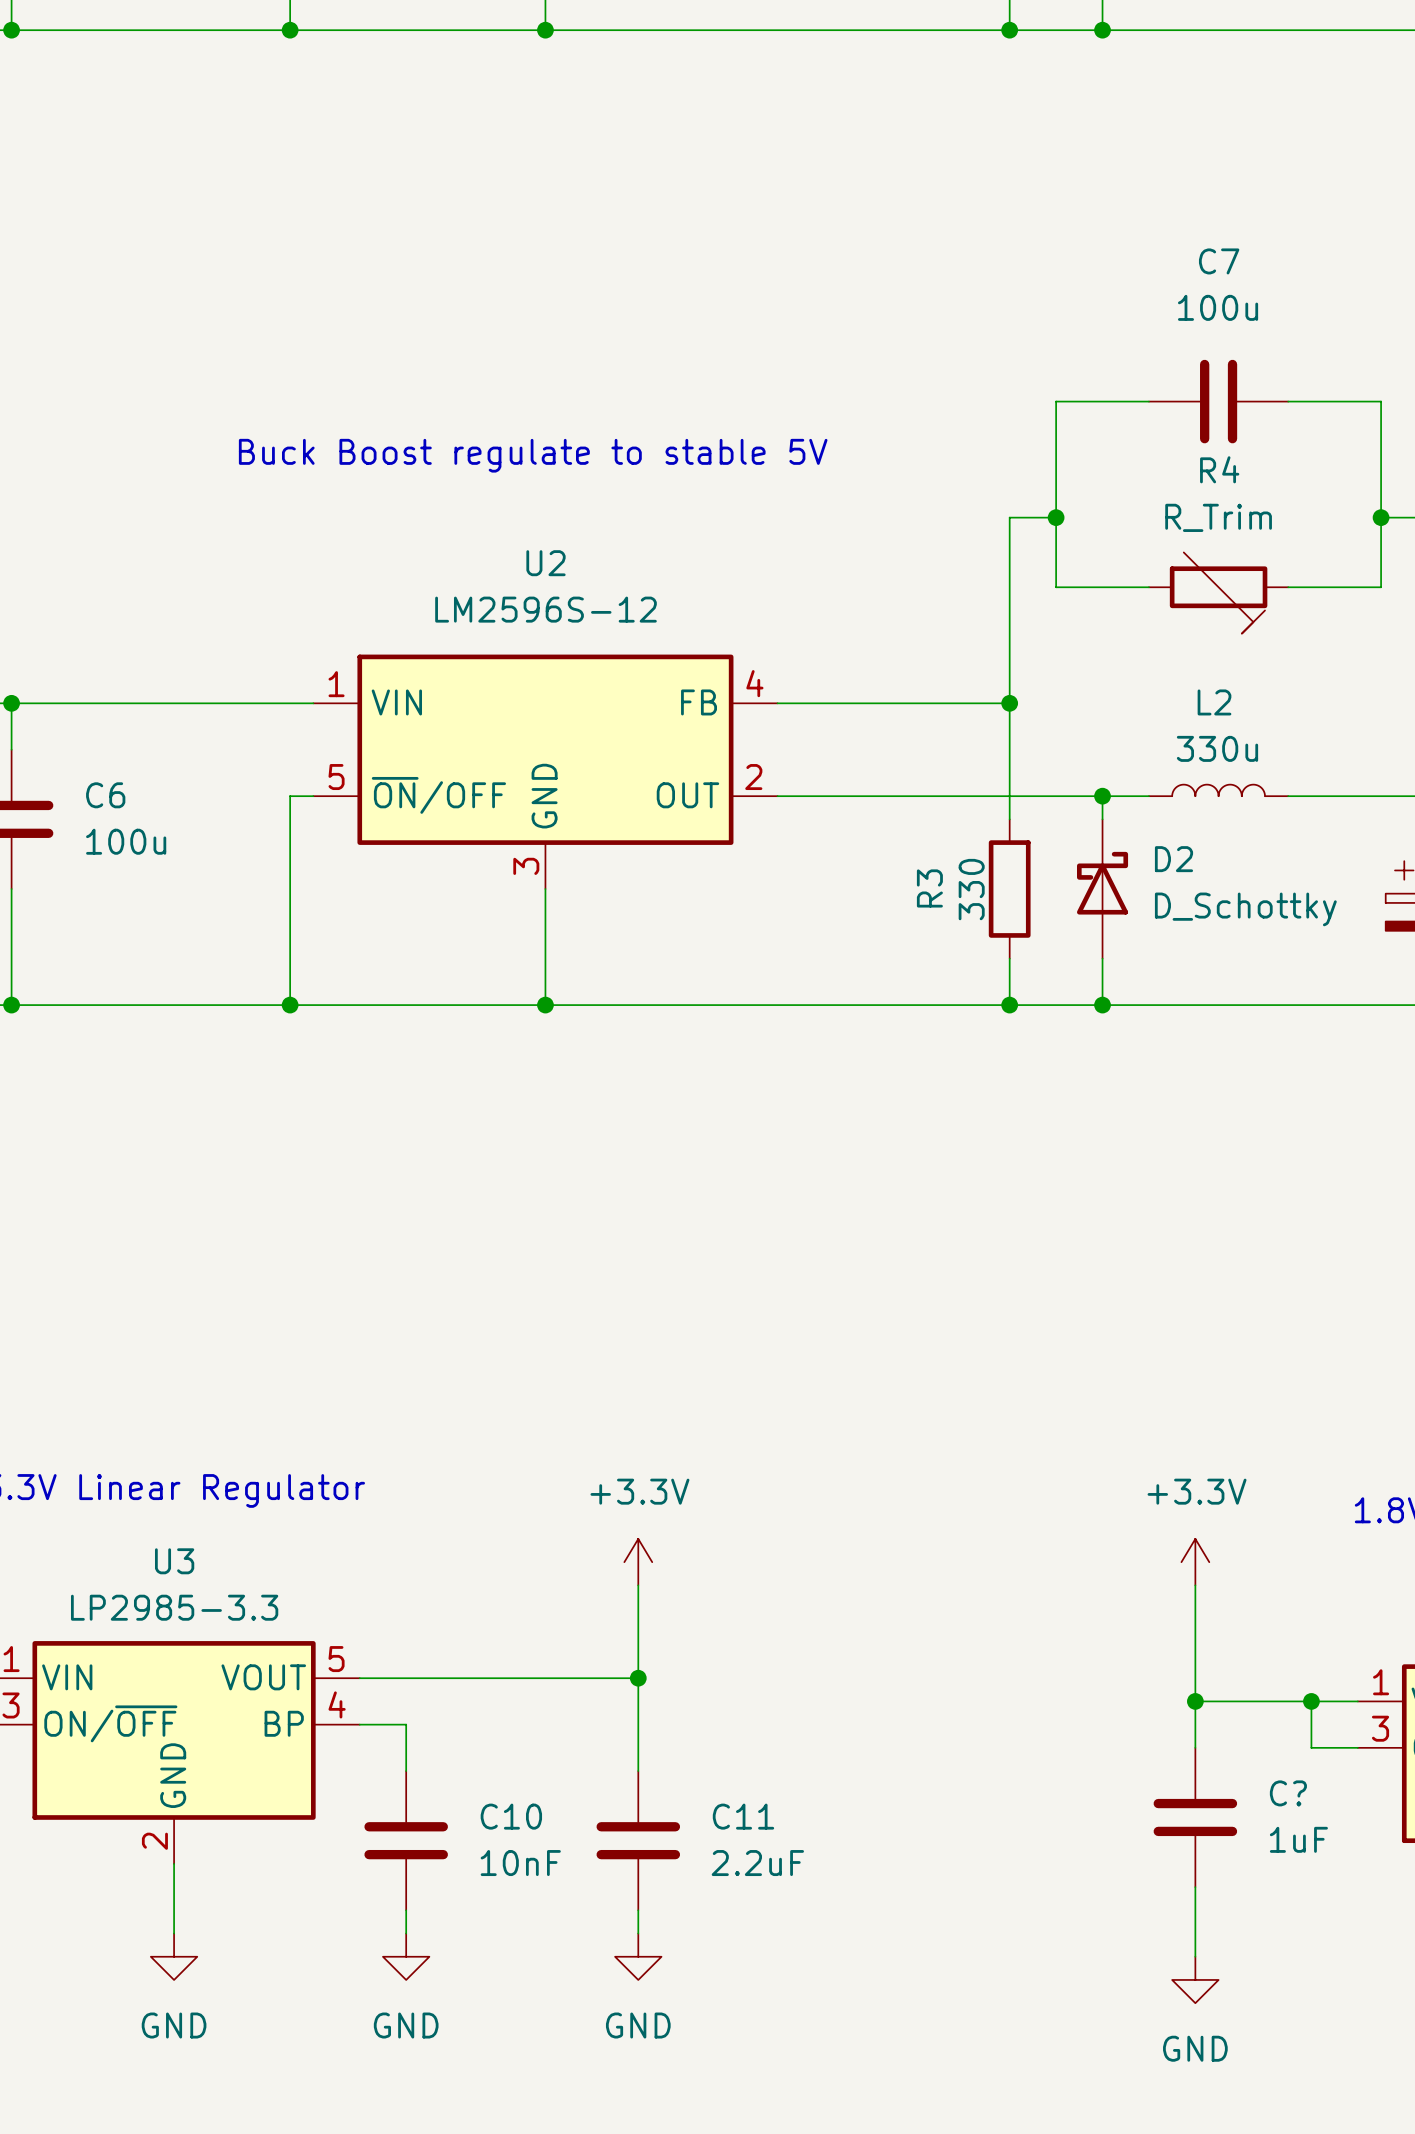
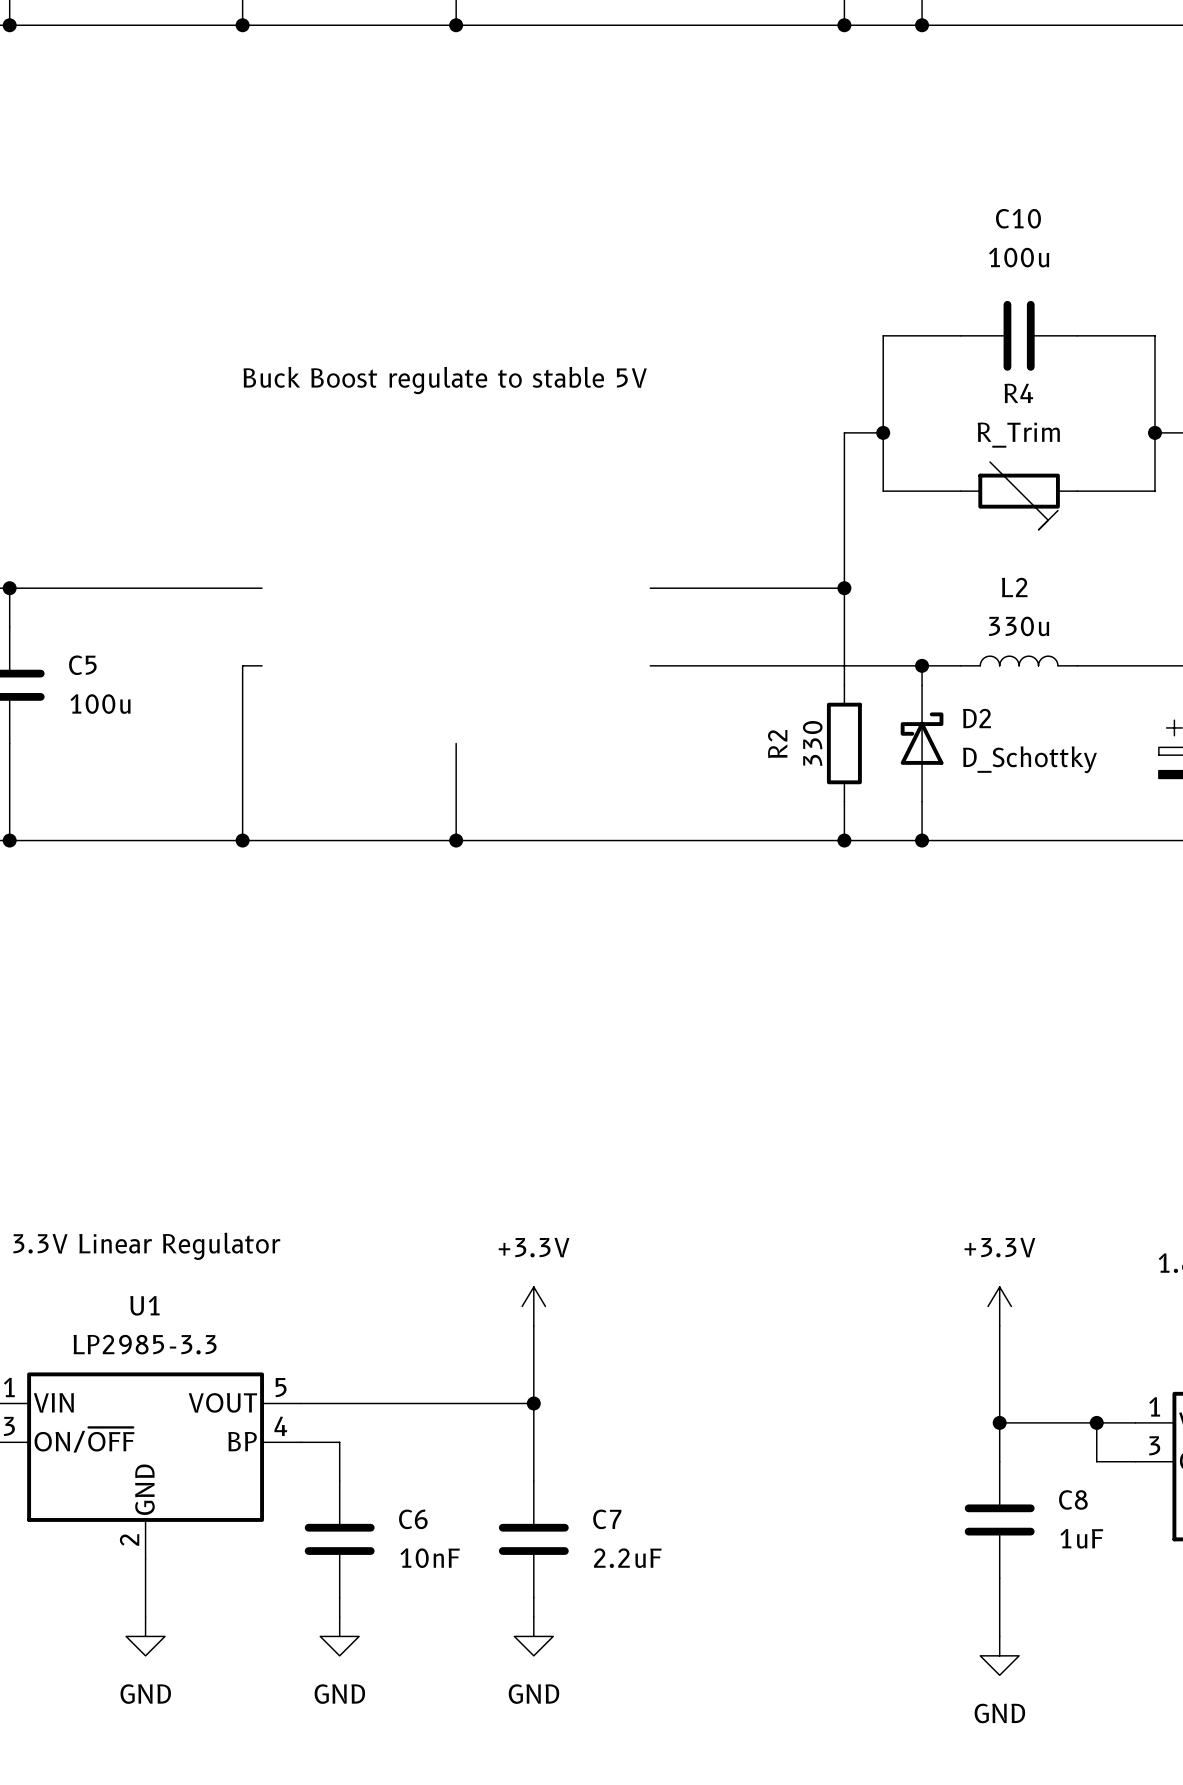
C7 name: C7 (1219, 261) -> C10 (1018, 218)
U2: LM2596S-12 (545, 771) -> none
C6 name: C6 (105, 795) -> C5 (82, 665)
R3 name: R3 (929, 888) -> R2 (777, 744)
U3 name: U3 (174, 1561) -> U1 (144, 1305)
C? name: C? (1288, 1793) -> C8 (1073, 1499)
C10 name: C10 (511, 1816) -> C6 (413, 1519)
C11 name: C11 (743, 1816) -> C7 (607, 1519)

